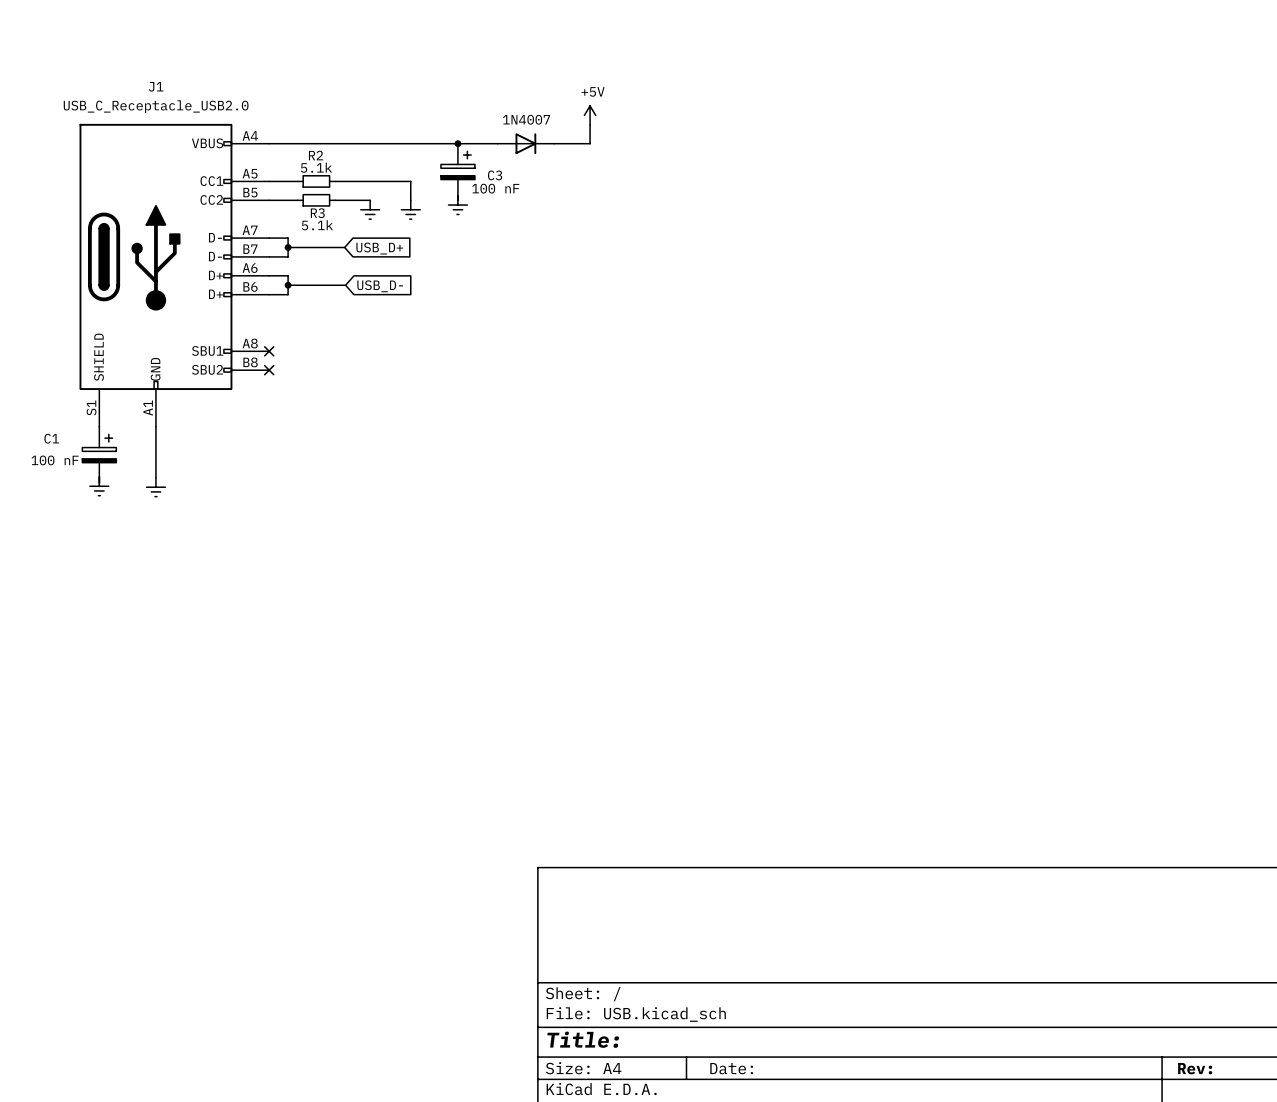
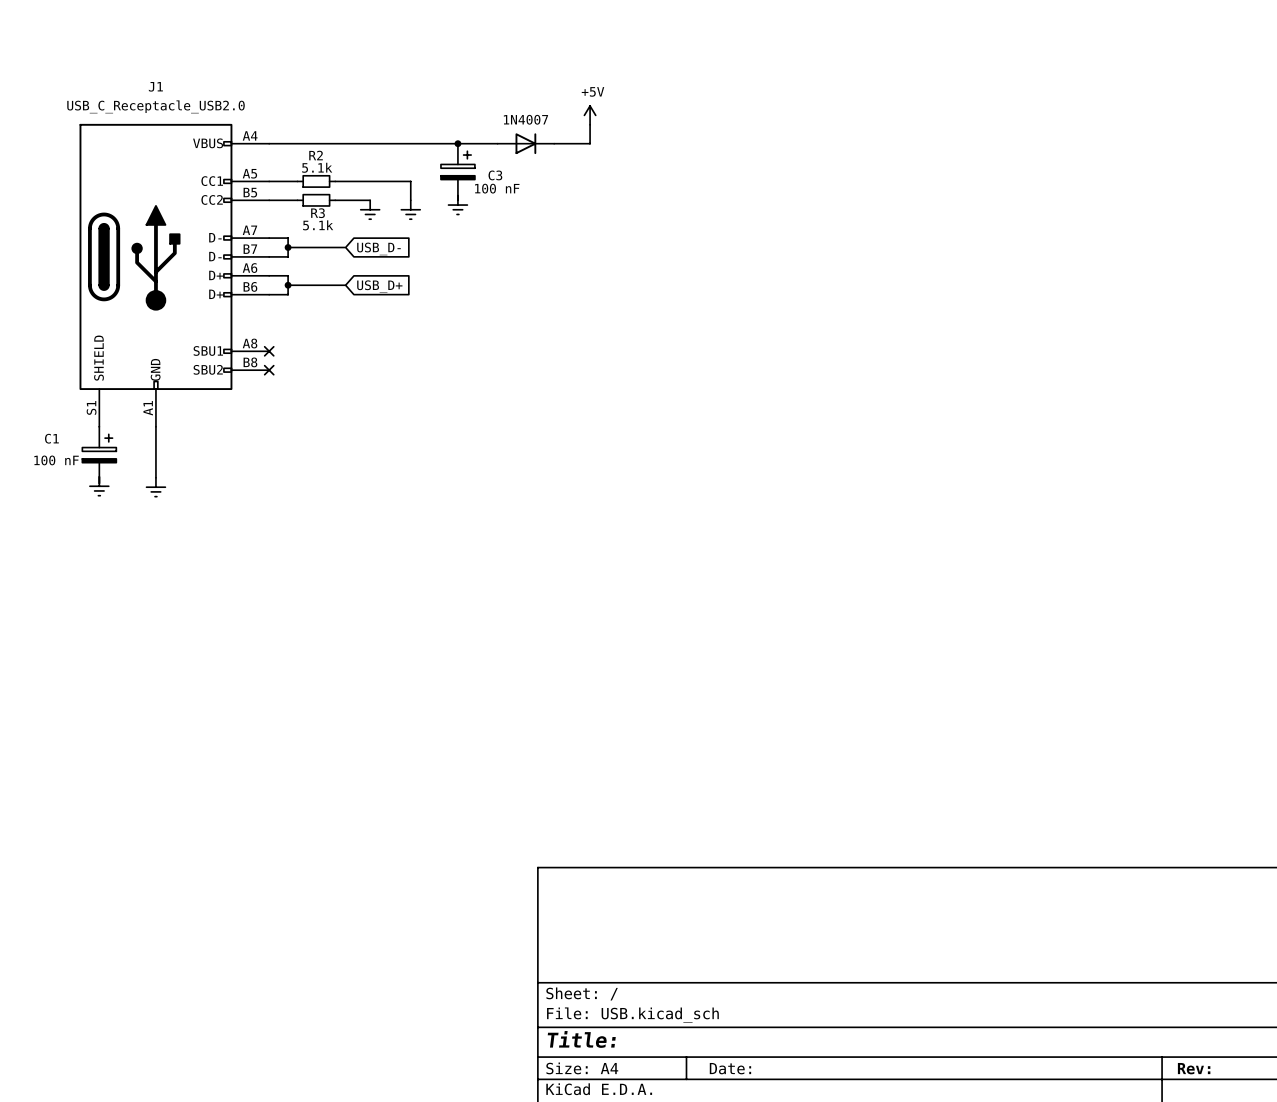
global label: USB_D+ (379, 248) -> USB_D- (378, 248)
global label: USB_D- (380, 286) -> USB_D+ (379, 286)

